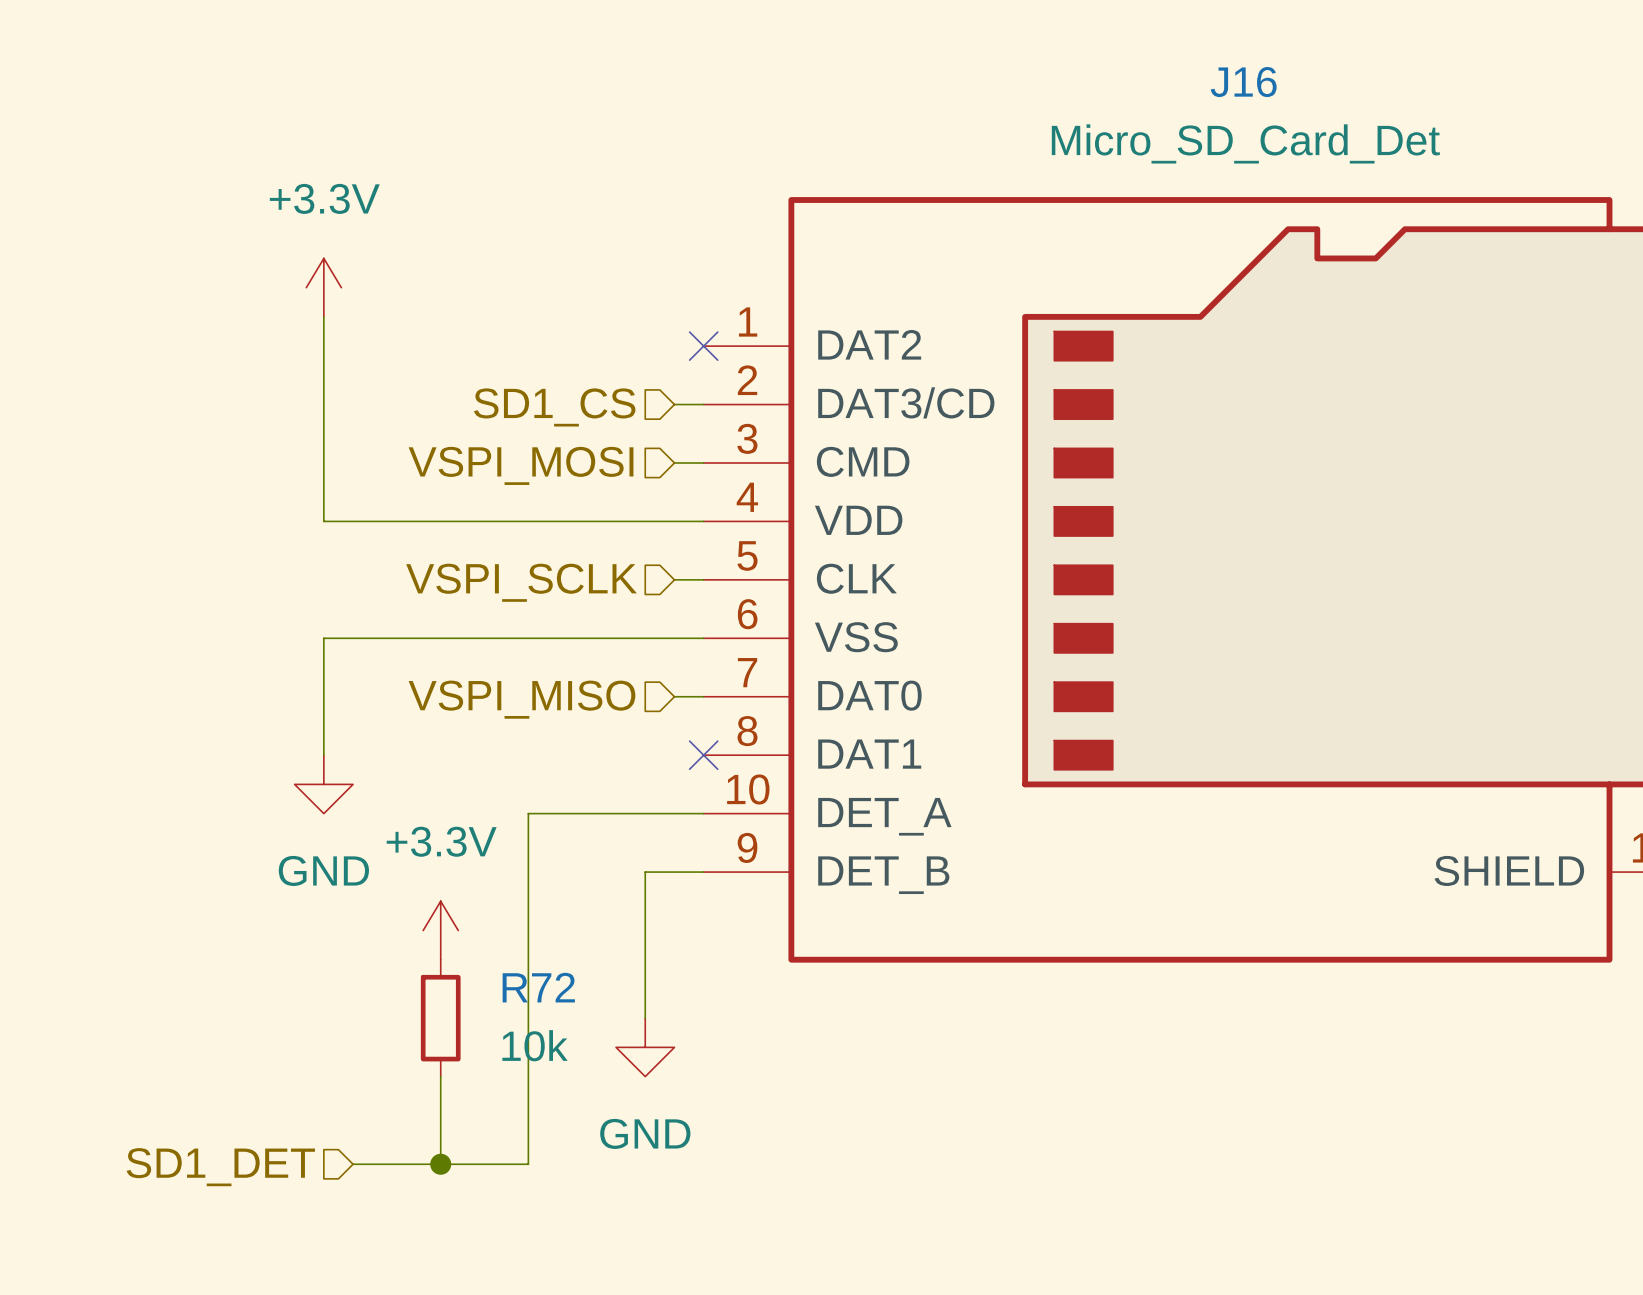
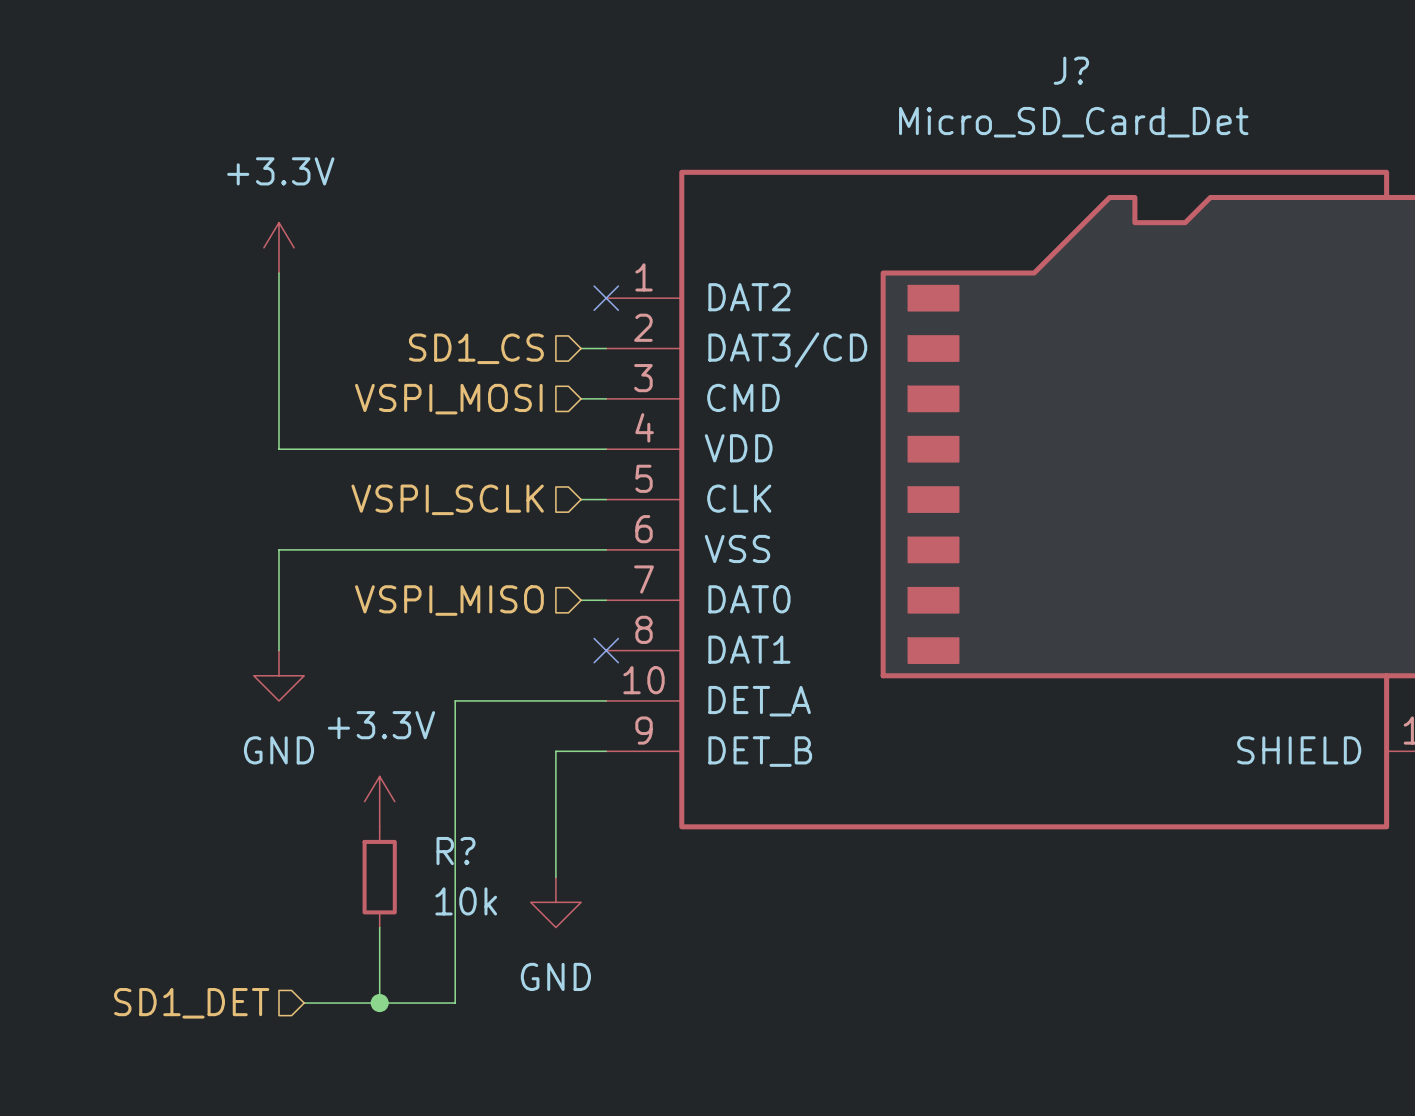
J16 name: J16 (1243, 82) -> J? (1071, 70)
R72 name: R72 (538, 987) -> R? (456, 851)

